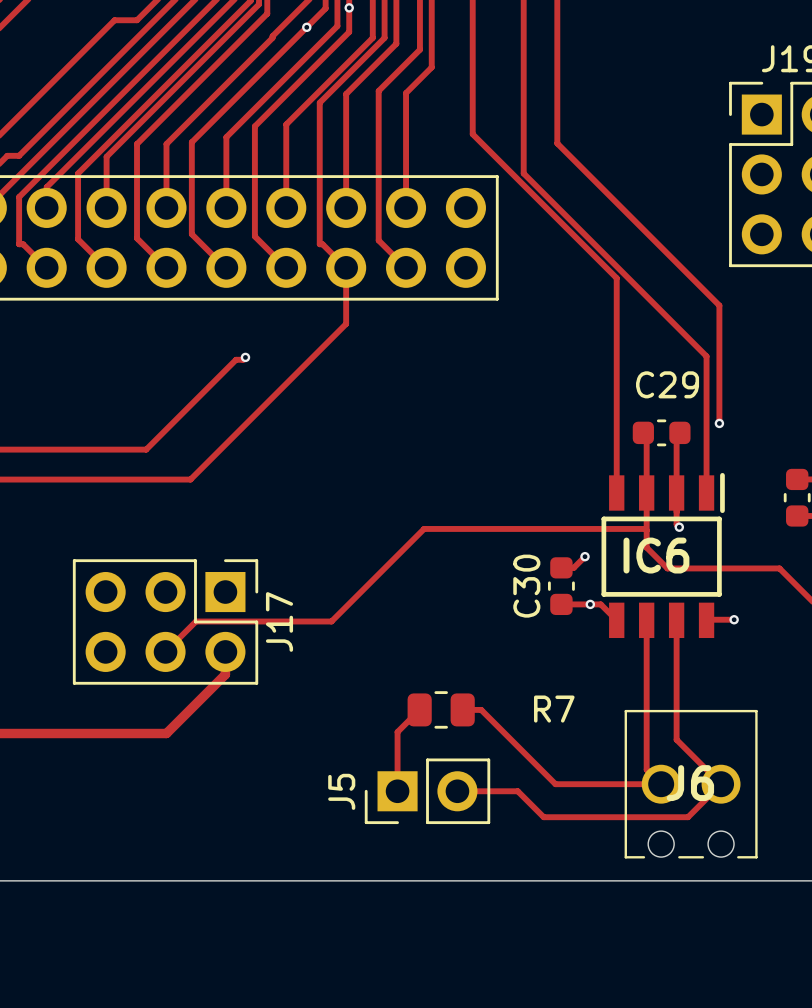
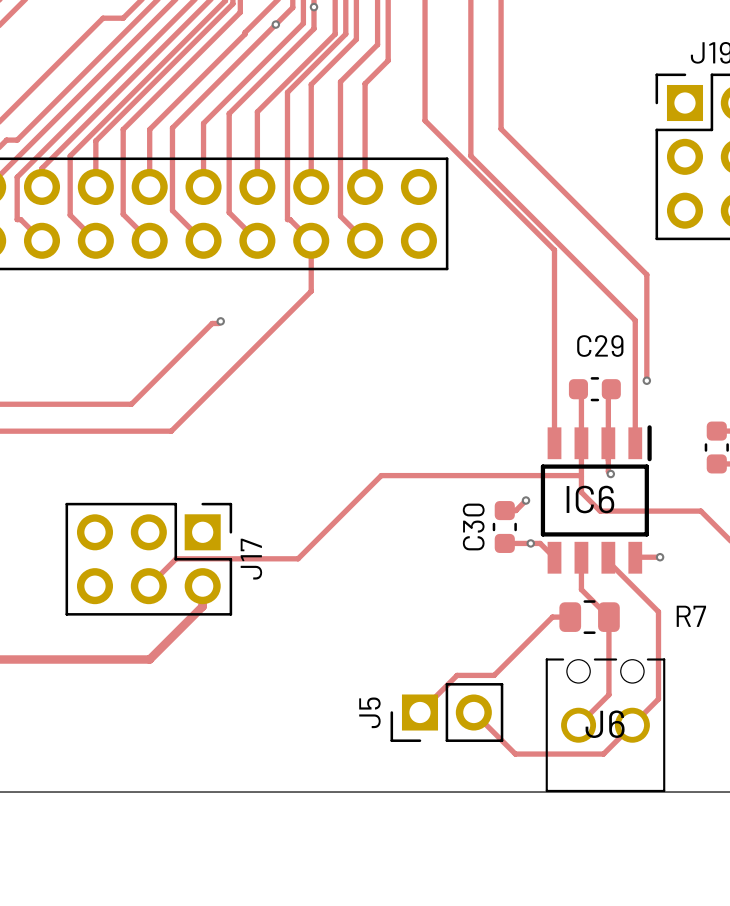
track: (676, 624) (676, 739) (721, 784) (688, 817) (543, 817) (517, 791) (457, 791) -> (608, 561) (658, 611) (658, 699) (603, 754) (515, 754) (473, 712)
track: (646, 655) (646, 769) (661, 784) (555, 784) (481, 709) (462, 709) -> (581, 589) (608, 617) (608, 694) (578, 725)
track: none -> (570, 617) (552, 617) (494, 675) (457, 675) (419, 712)
track: (419, 709) (397, 732) (397, 791) -> none
R7 position: (441, 709) -> (589, 617)
J6 rotation: 0° (691, 784) -> 180° (605, 725)
J5 position: (427, 791) -> (446, 712)

